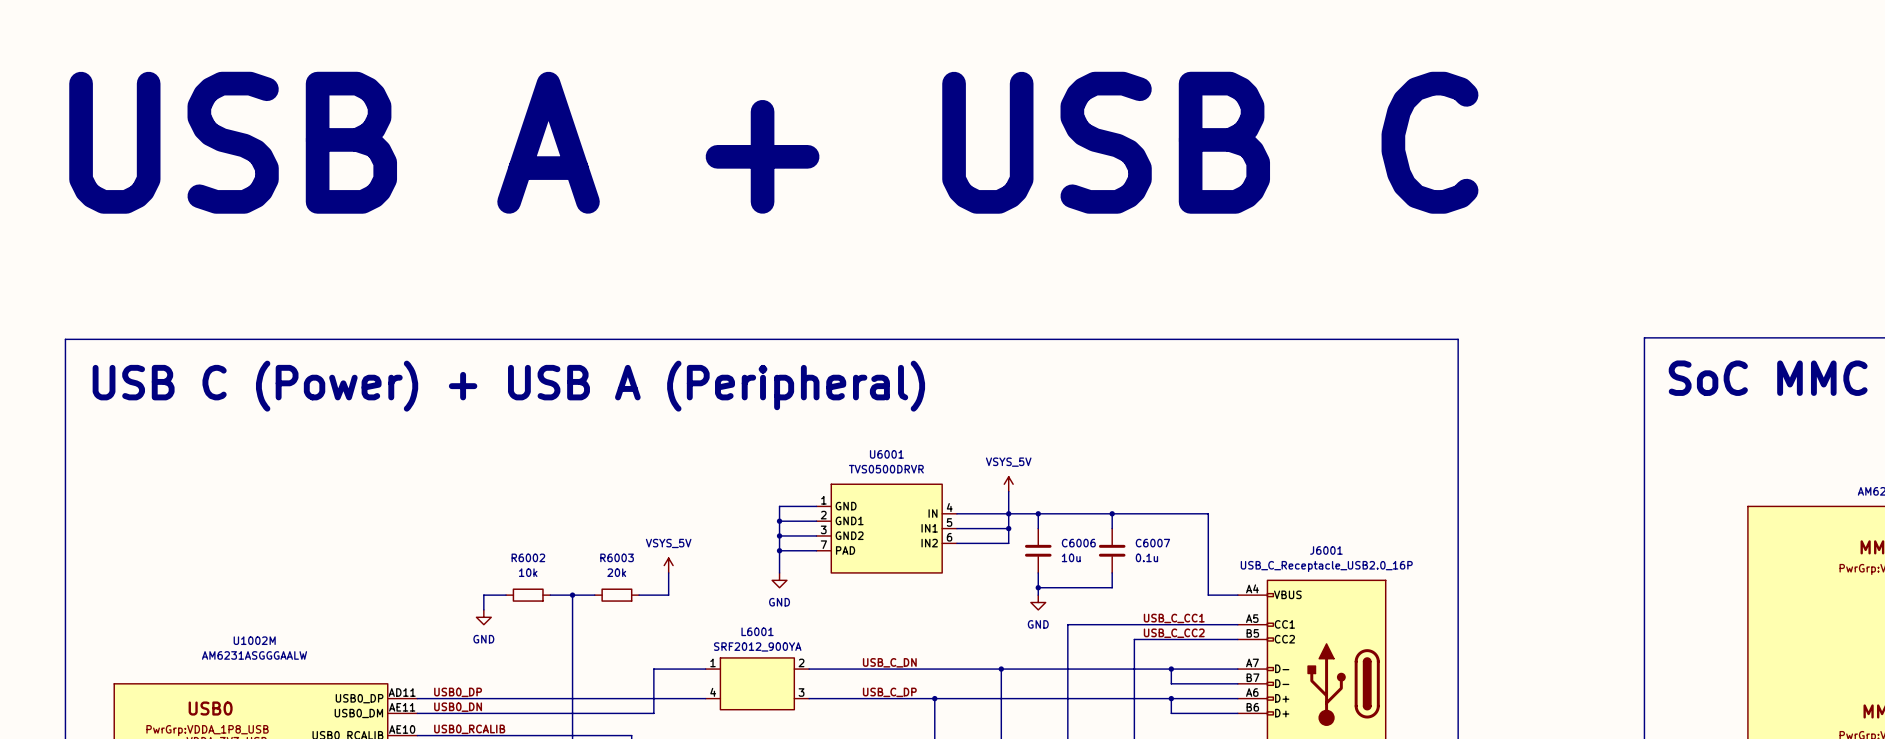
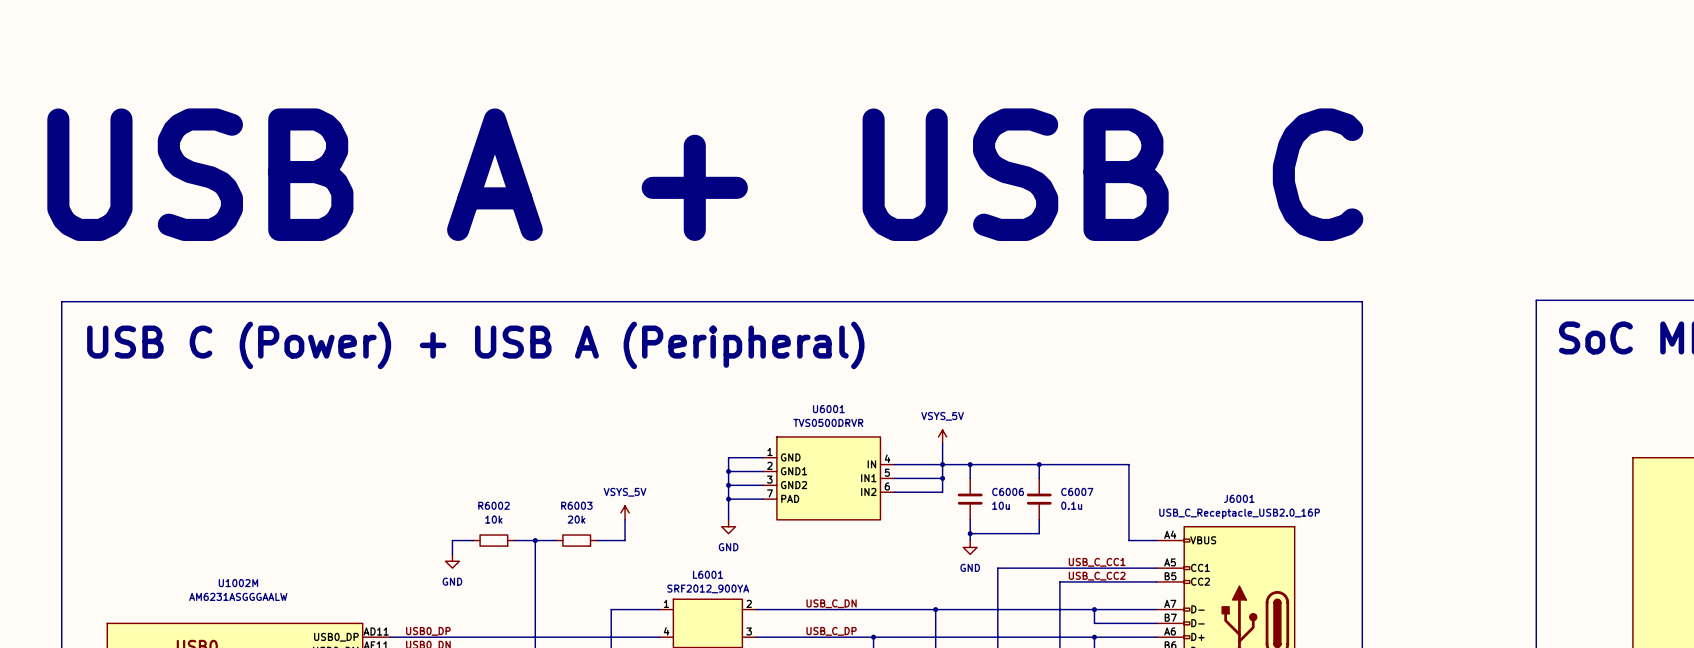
text position: USB A + USB C (773, 142) -> USB A + USB C (705, 174)

